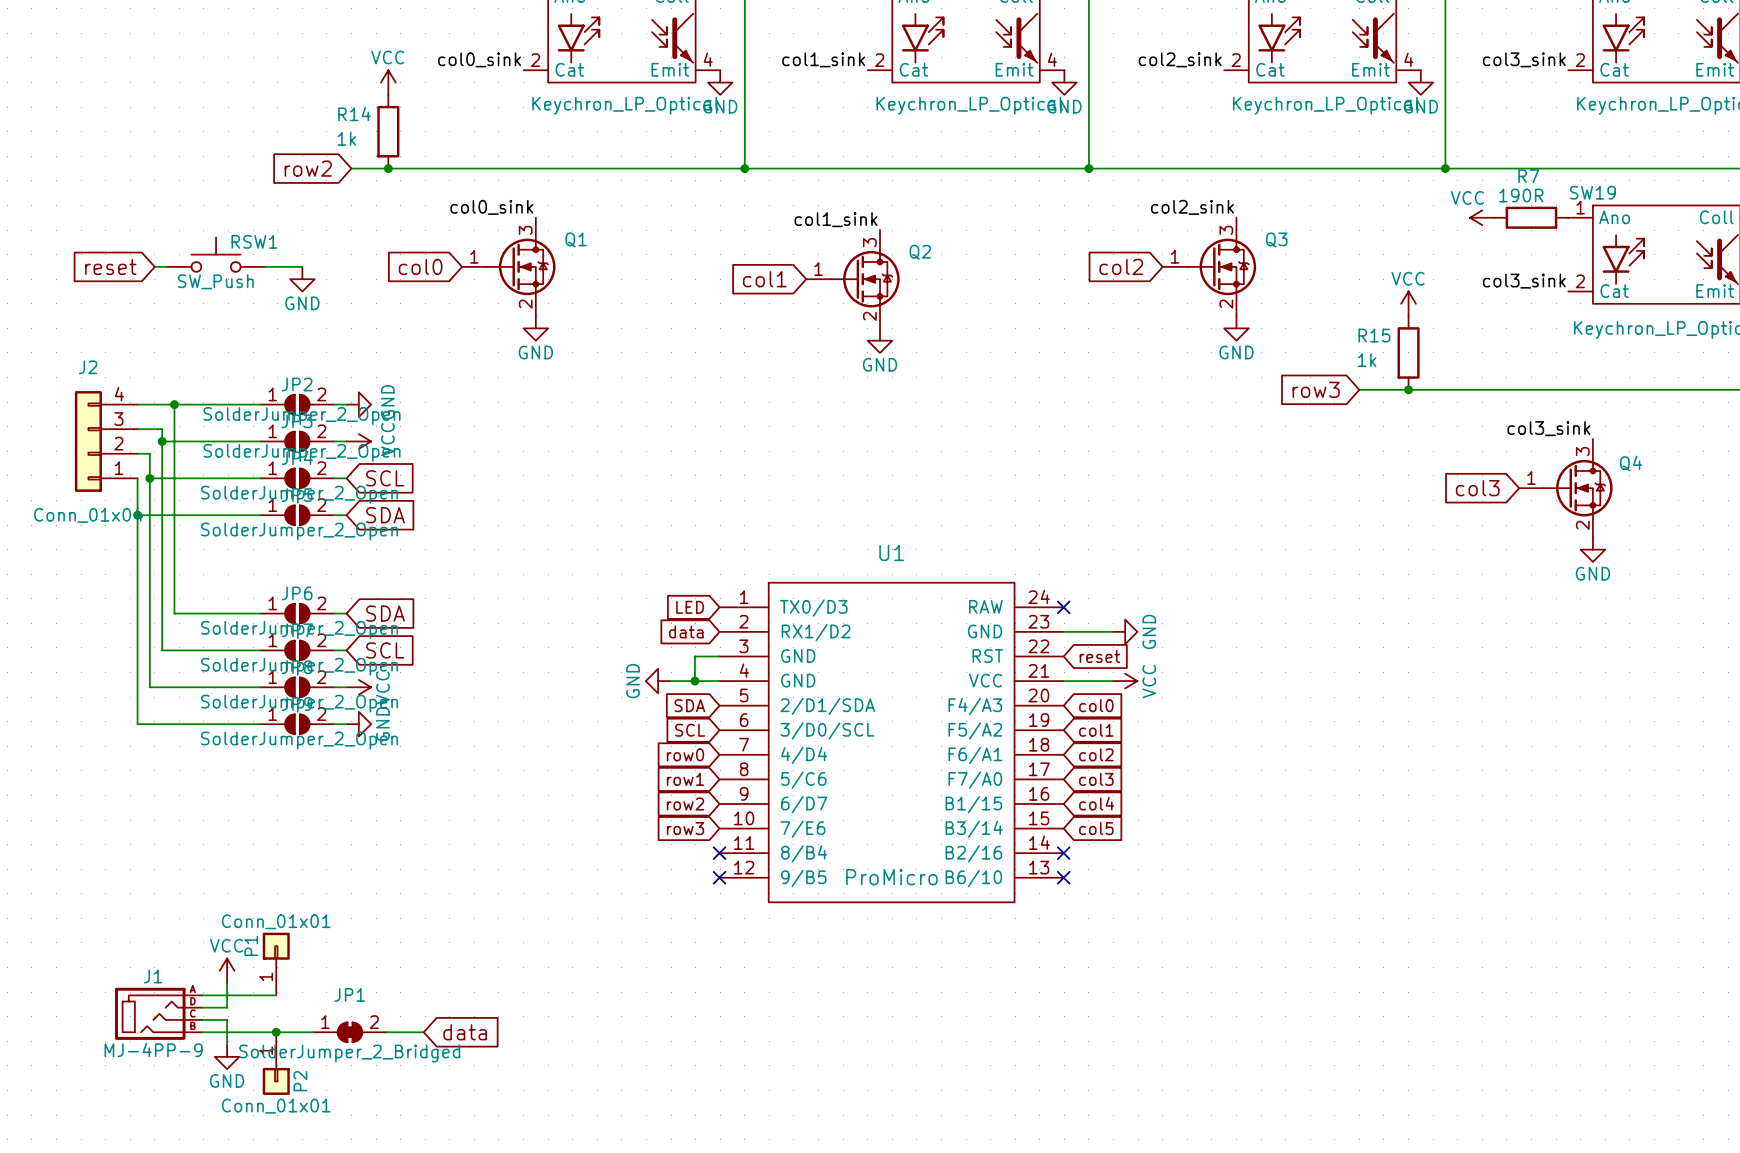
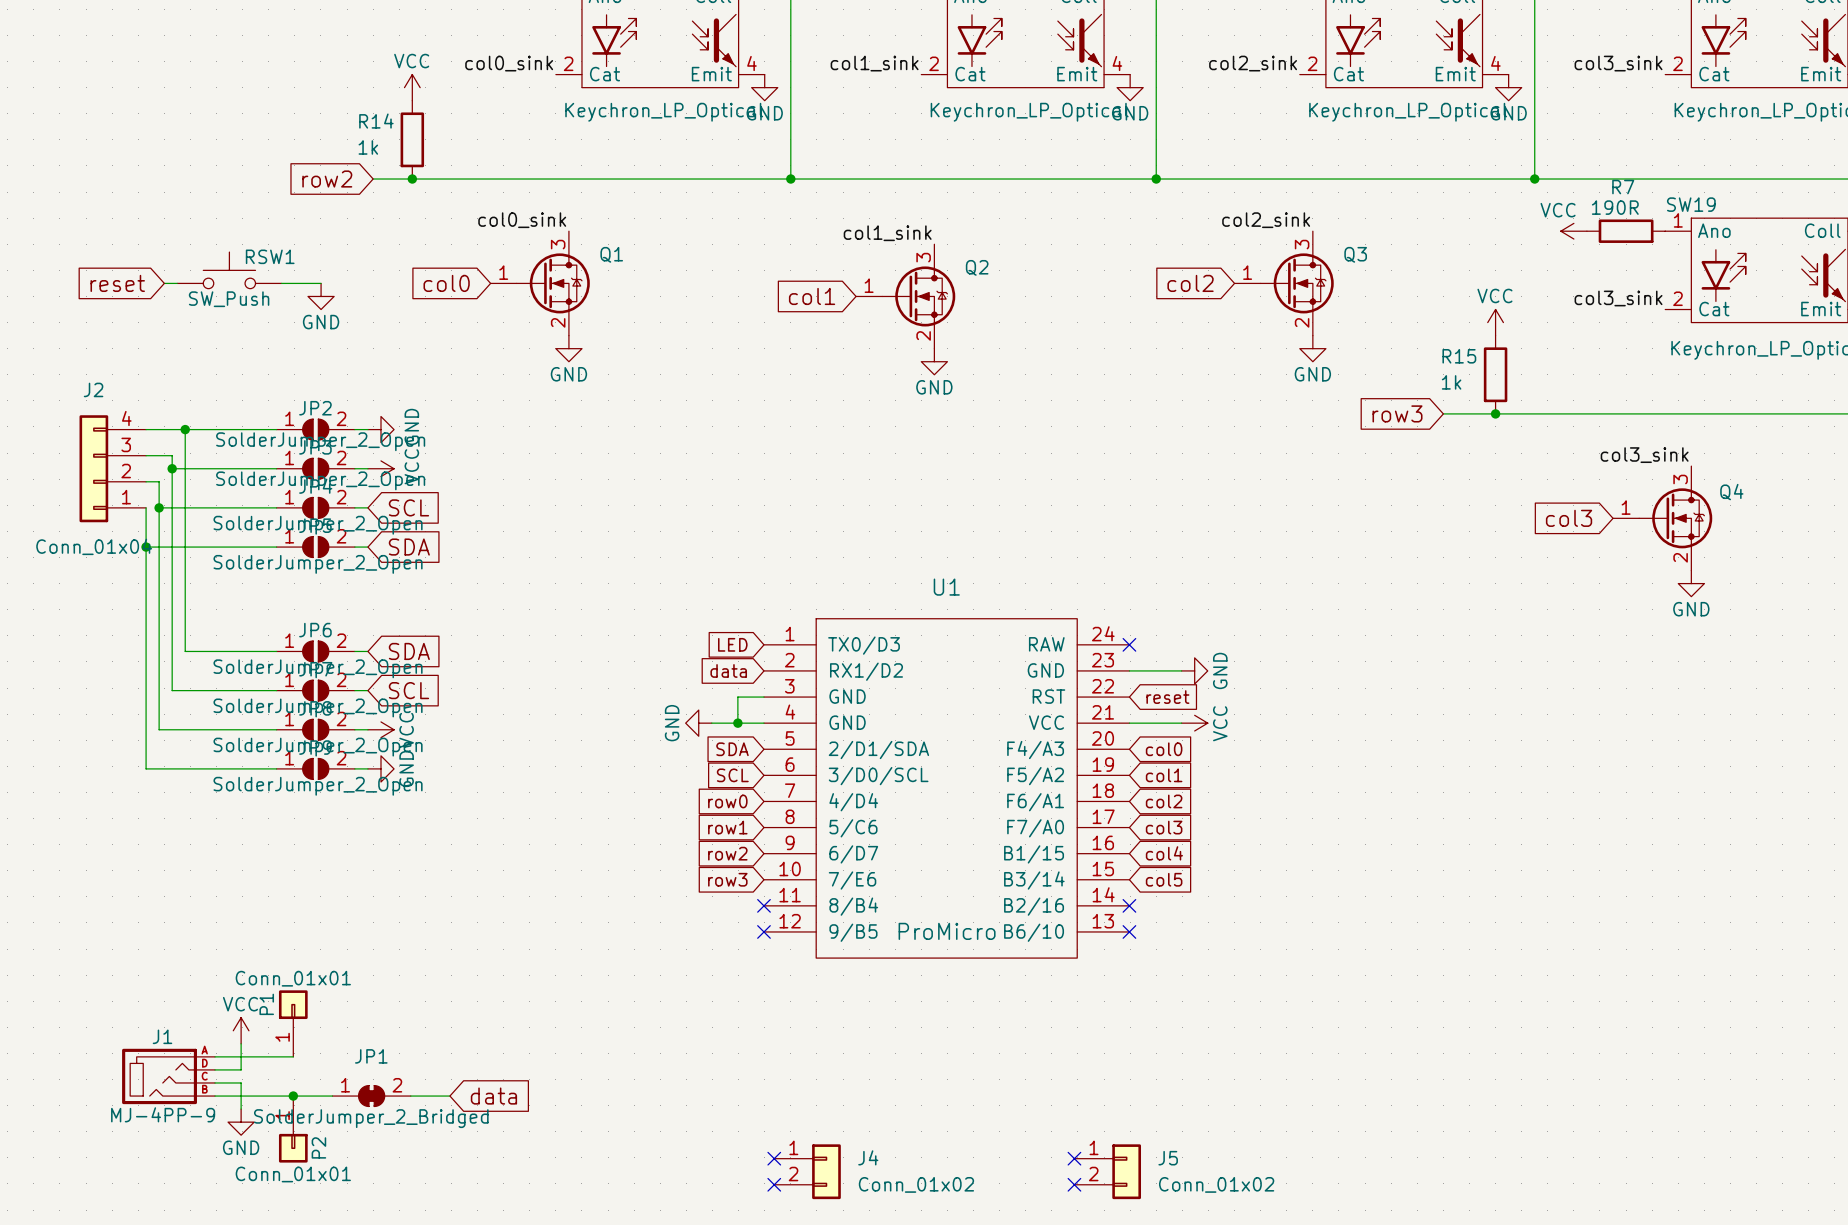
no-connect mark: none -> (774, 1158)
no-connect mark: none -> (1074, 1158)
J4: none -> Conn_01x02 (807, 1171)
J5: none -> Conn_01x02 (1107, 1171)
no-connect mark: none -> (774, 1184)
no-connect mark: none -> (1074, 1184)

